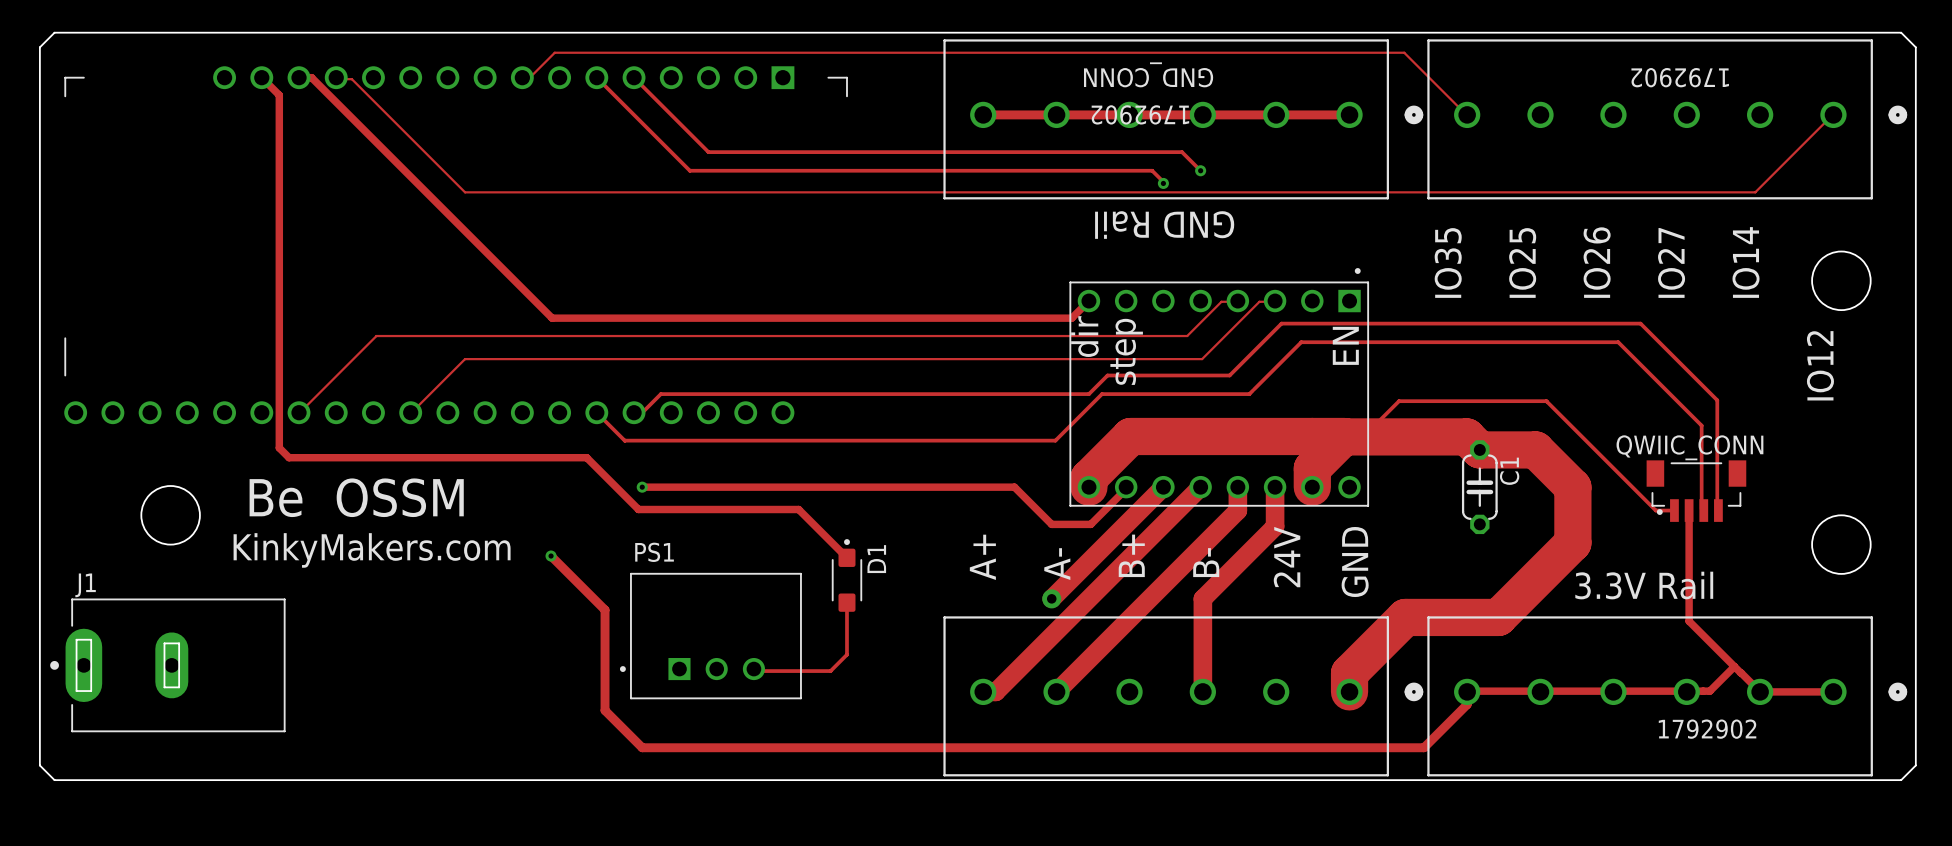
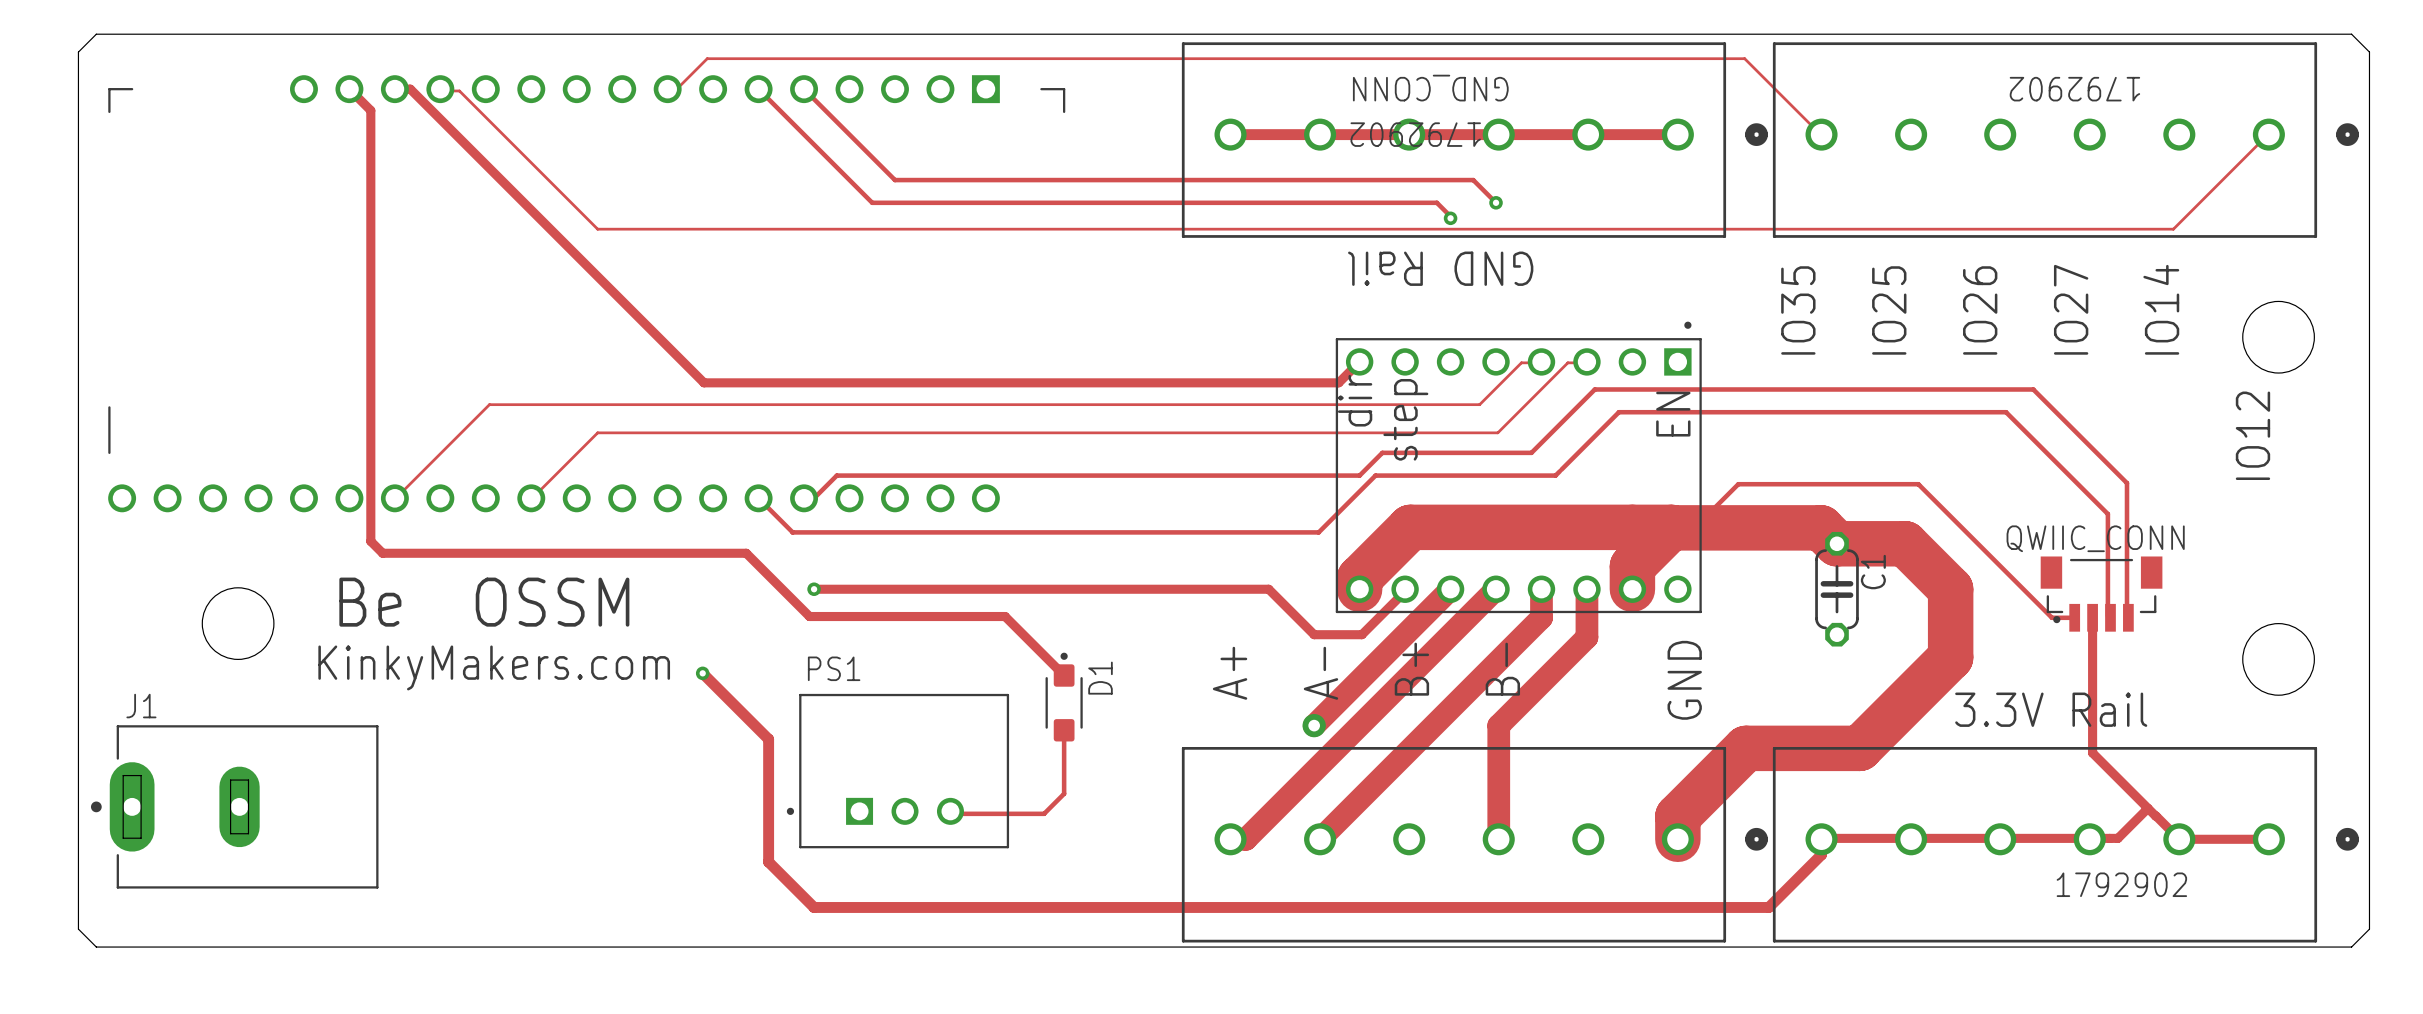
text: 24V (1287, 557) -> none

